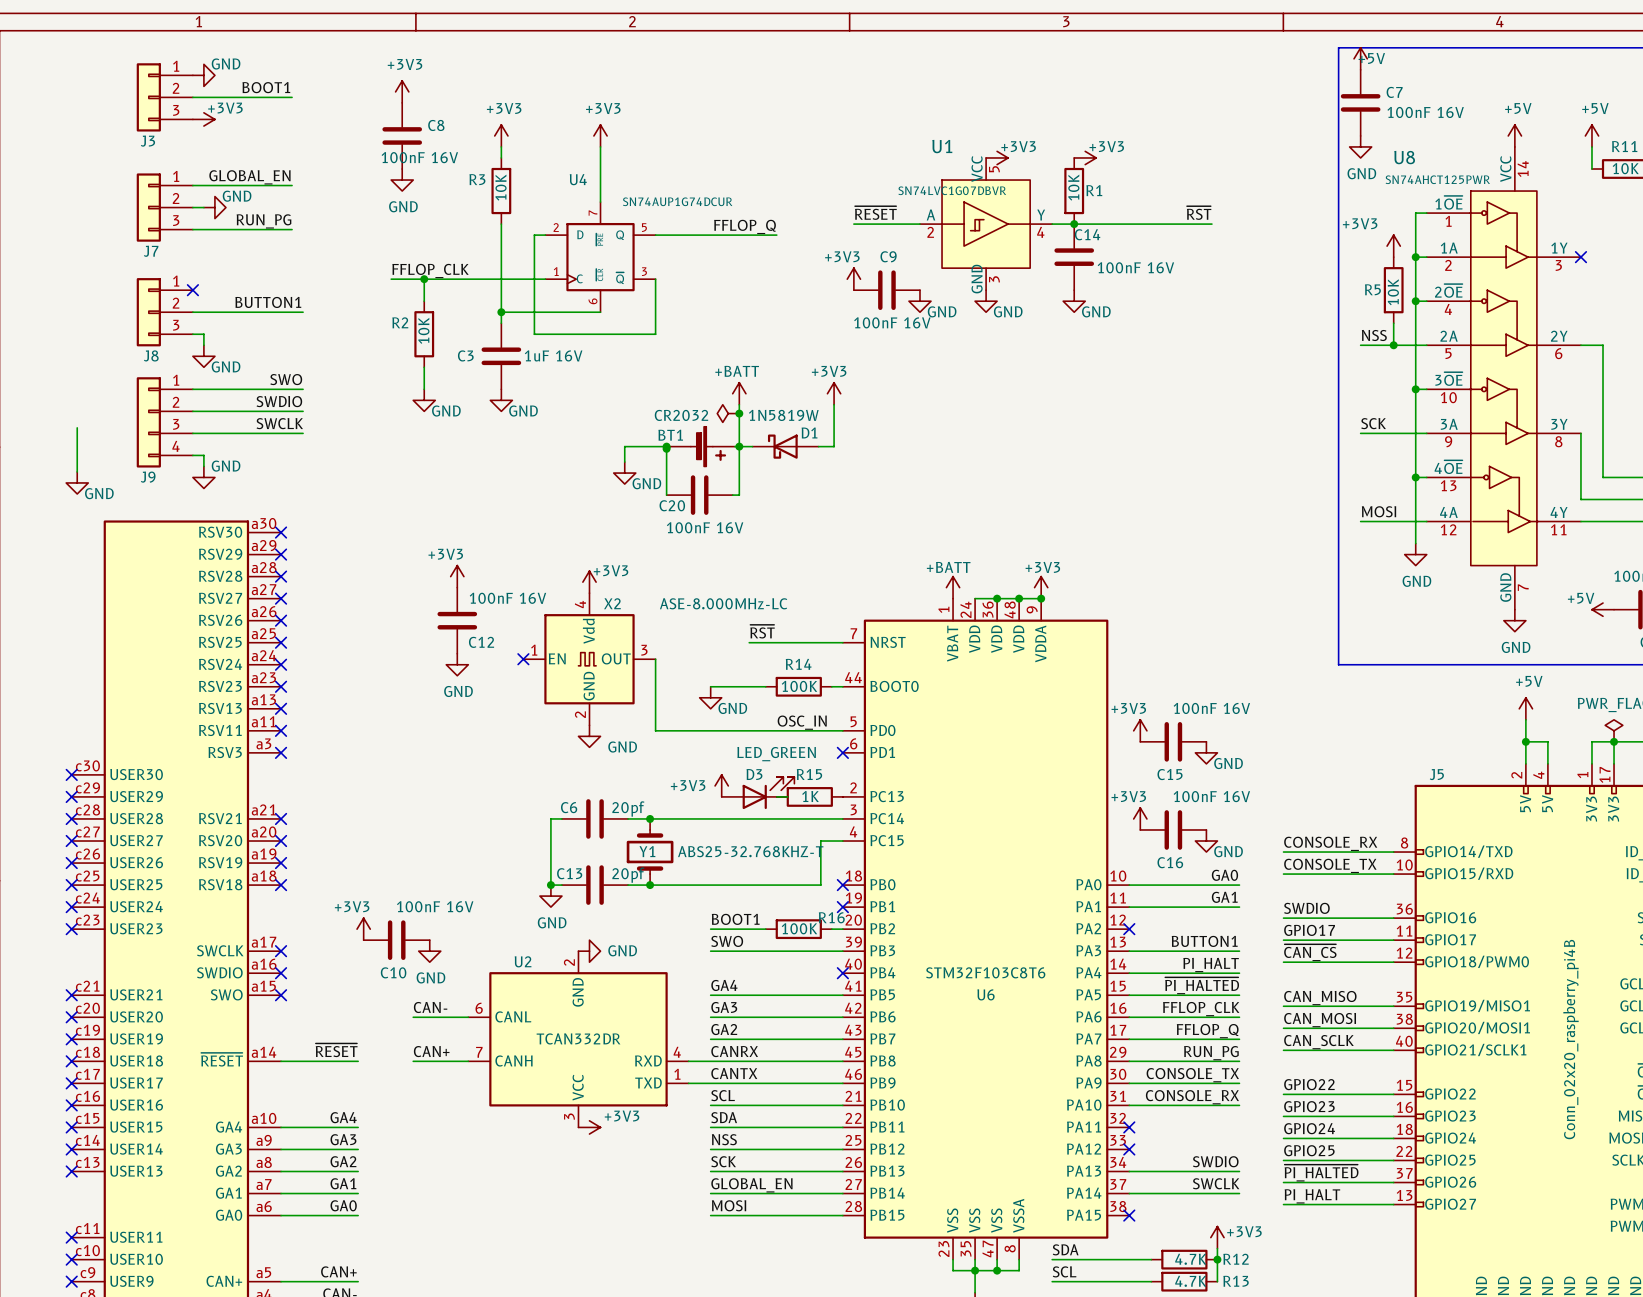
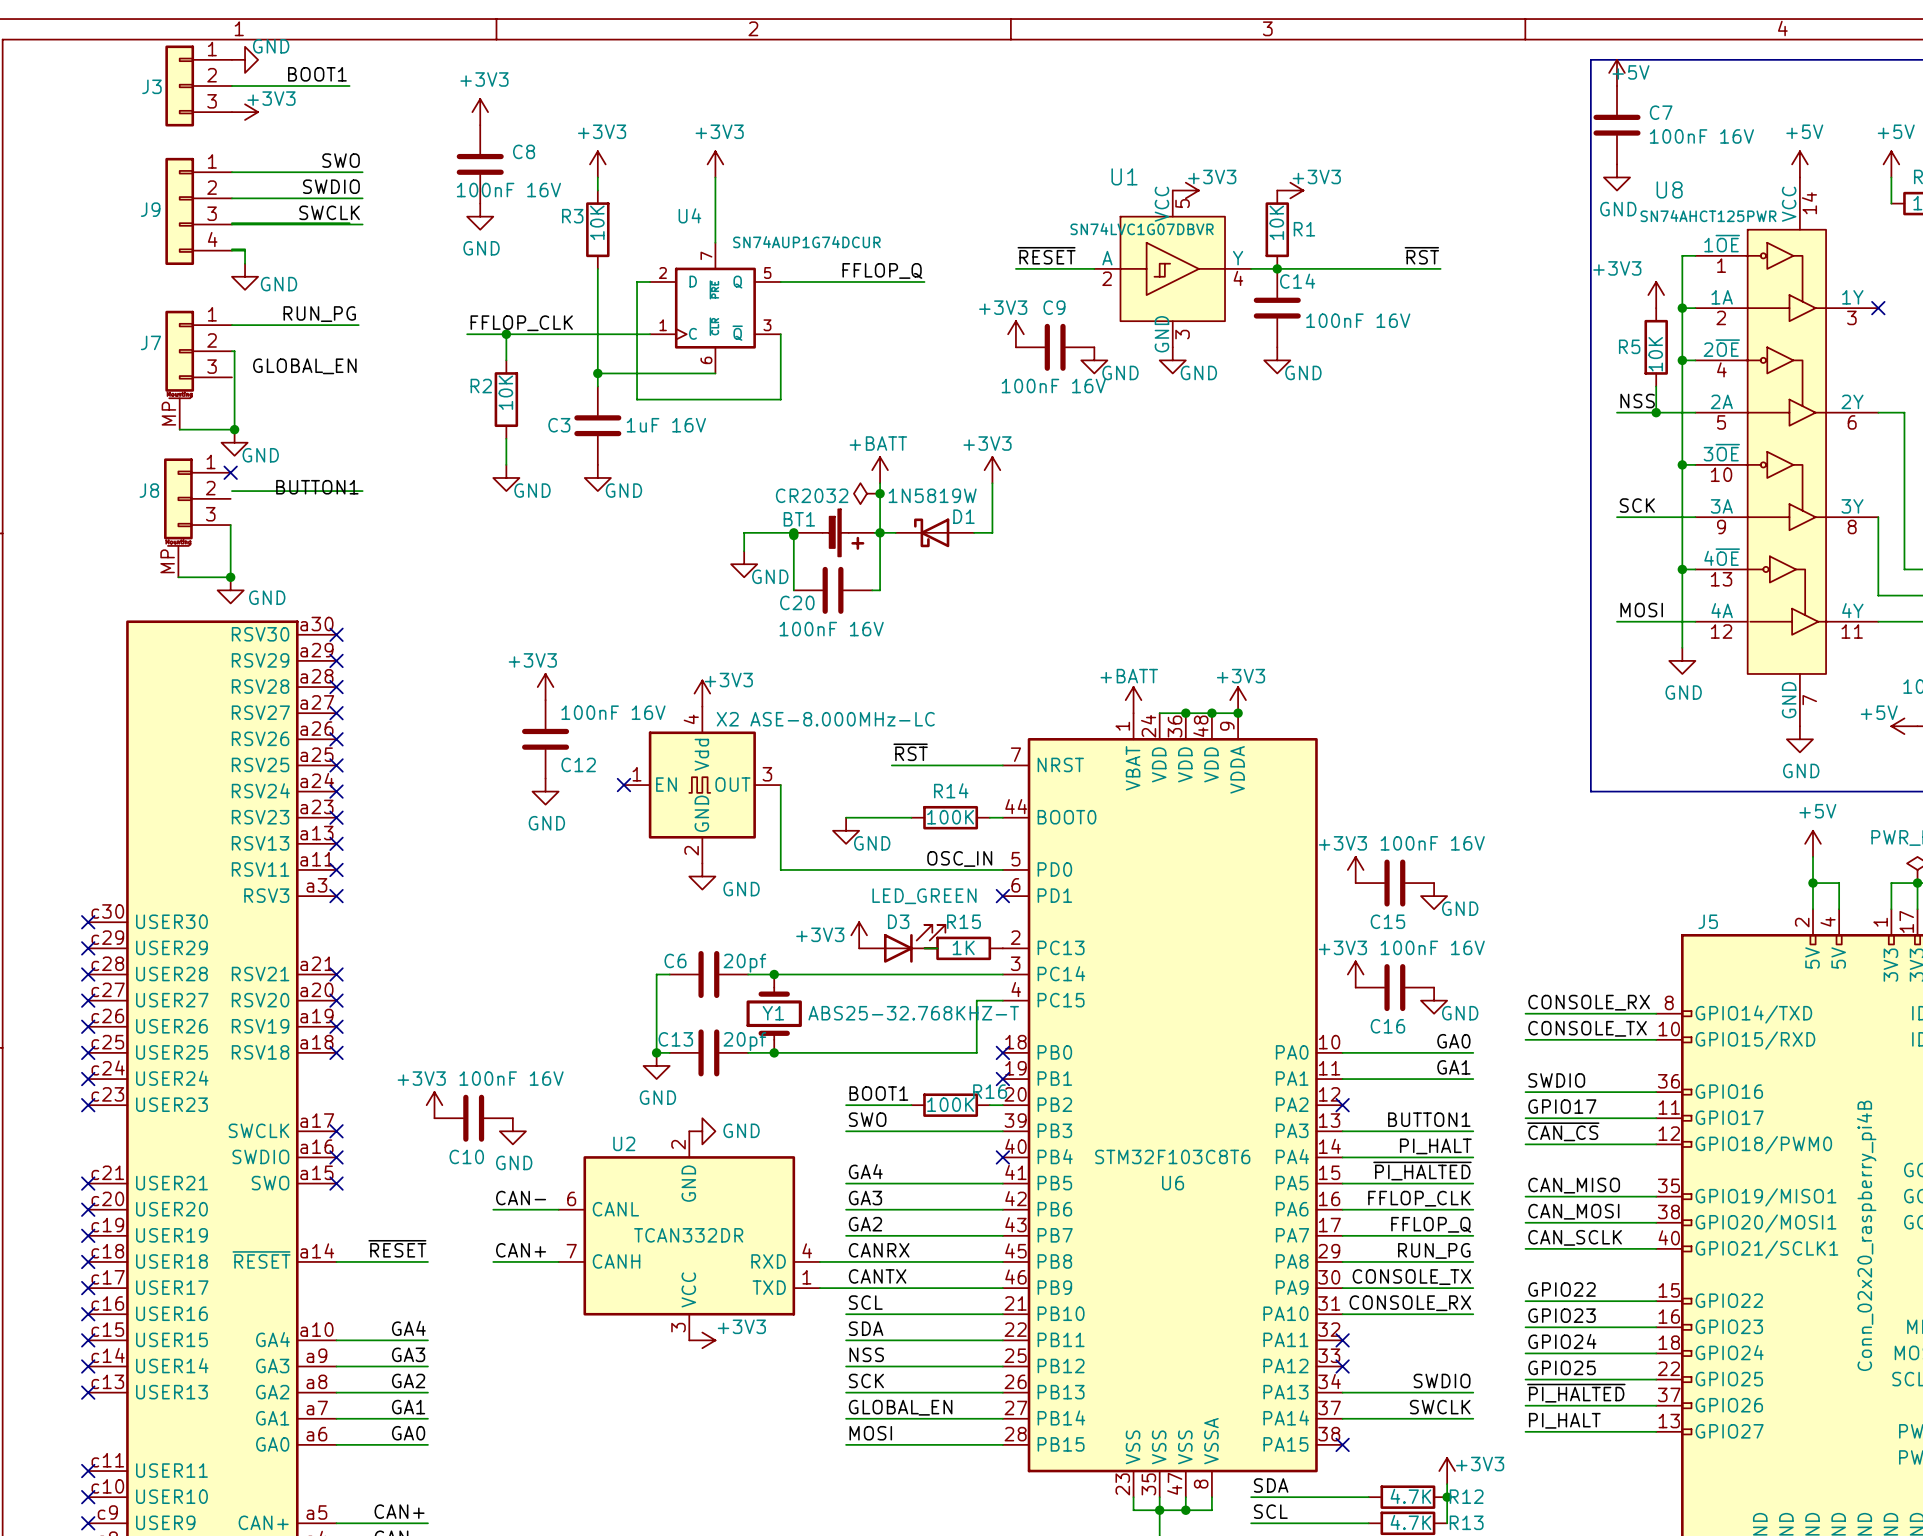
power symbol position: GND (203, 75) -> GND (245, 59)
label position: BOOT1 (266, 87) -> BOOT1 (317, 74)
J3 position: (164, 97) -> (198, 85)
wire: (192, 97) (292, 97) -> (231, 85) (349, 85)
power symbol position: +3V3 (203, 119) -> +3V3 (245, 112)
label: none -> SWO (341, 160)
J3 name position: J3 (147, 141) -> J3 (151, 86)
wire: none -> (231, 172) (362, 172)
label: none -> SWDIO (331, 186)
wire: none -> (231, 198) (362, 198)
J7 symbol: [136, 173, 193, 242] -> [165, 310, 232, 430]
label: none -> SWCLK (329, 212)
label position: GLOBAL_EN (249, 177) -> GLOBAL_EN (304, 366)
power symbol text position: GND (237, 196) -> GND (279, 284)
power symbol rotation: 0° (214, 207) -> 90° clockwise (245, 276)
power symbol position: GND (214, 207) -> GND (245, 276)
label position: RUN_PG (263, 221) -> RUN_PG (319, 314)
wire: (192, 229) (292, 229) -> none
J7 name position: J7 (151, 251) -> J7 (150, 342)
wire: none -> (231, 325) (358, 325)
J8 symbol: [136, 278, 193, 347] -> [164, 458, 231, 578]
no-connect mark: (192, 290) -> none
wire: none -> (231, 351) (234, 351) (234, 429) (179, 429)
label position: BUTTON1 (268, 302) -> BUTTON1 (317, 487)
wire: (192, 312) (303, 312) -> (231, 224) (362, 224)
wire: (192, 334) (203, 334) (203, 345) -> (231, 250) (245, 250) (245, 263)
J8 name position: J8 (151, 355) -> J8 (149, 490)
power symbol position: GND (203, 356) -> GND (234, 442)
junction: none -> (234, 429)
label: SWO (286, 379) -> none
wire: (192, 389) (303, 389) -> none
no-connect mark: none -> (230, 472)
label: SWDIO (279, 401) -> none
J9 position: (164, 422) -> (198, 211)
label: SWCLK (279, 423) -> none
wire: (77, 427) (77, 471) -> none
wire: (192, 433) (303, 433) -> none
wire: none -> (230, 525) (230, 577) (178, 577)
wire: (192, 455) (203, 455) (203, 466) -> none
power symbol text position: GND (226, 466) -> GND (267, 597)
J9 name position: J9 (148, 477) -> J9 (150, 209)
power symbol position: GND (203, 477) -> GND (230, 590)
power symbol: GND (77, 482) -> none
junction: none -> (230, 577)

